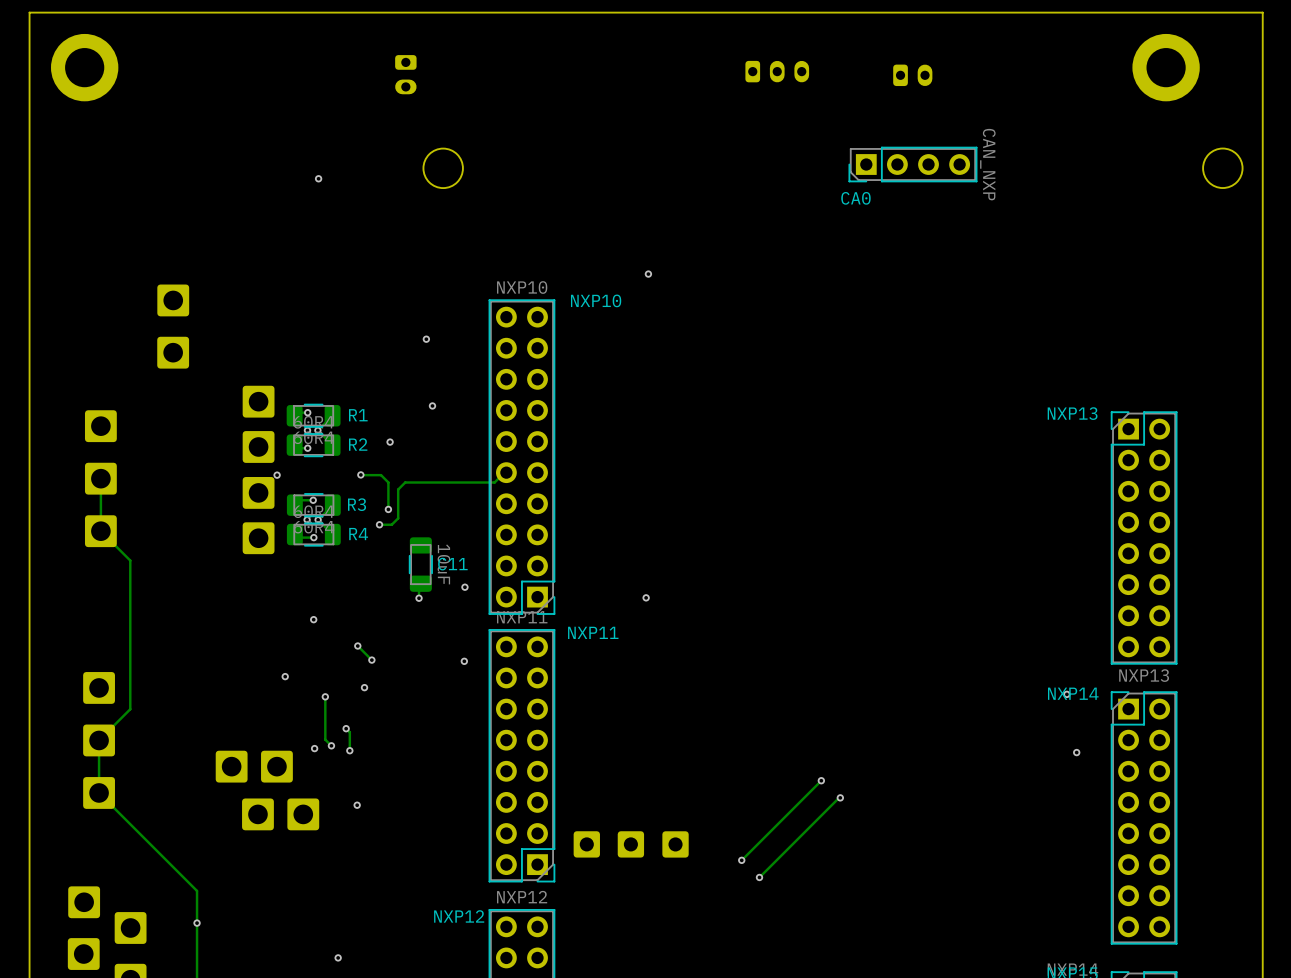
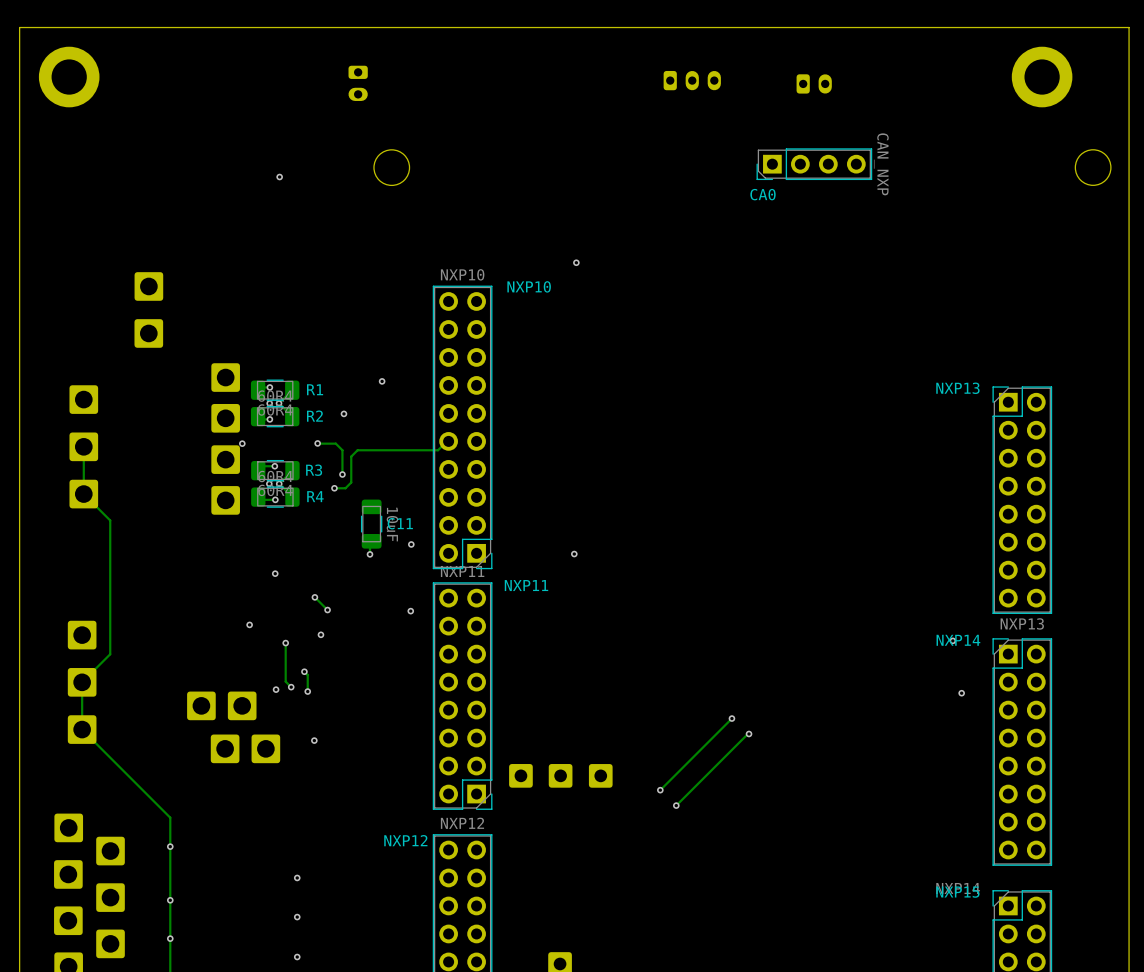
via: (426, 339) -> none

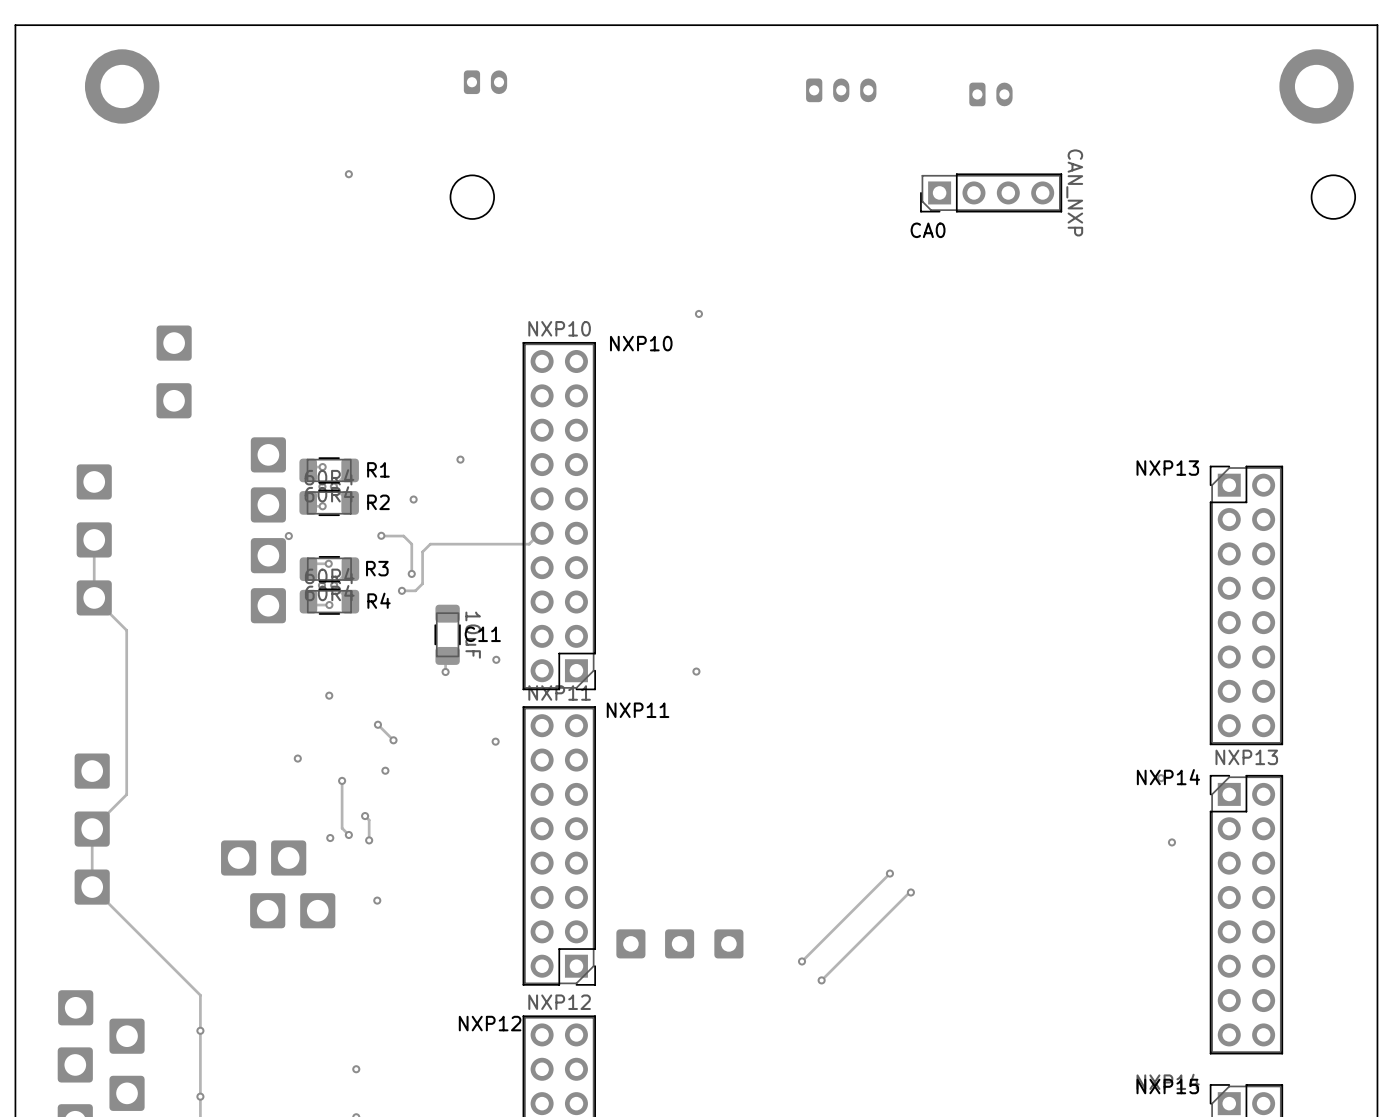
part position: (69, 77) -> (122, 86)
part position: (1042, 77) -> (1316, 86)
part rotation: 0° (358, 83) -> 90° counterclockwise (485, 82)
part position: (358, 83) -> (485, 82)
via position: (279, 177) -> (348, 174)

